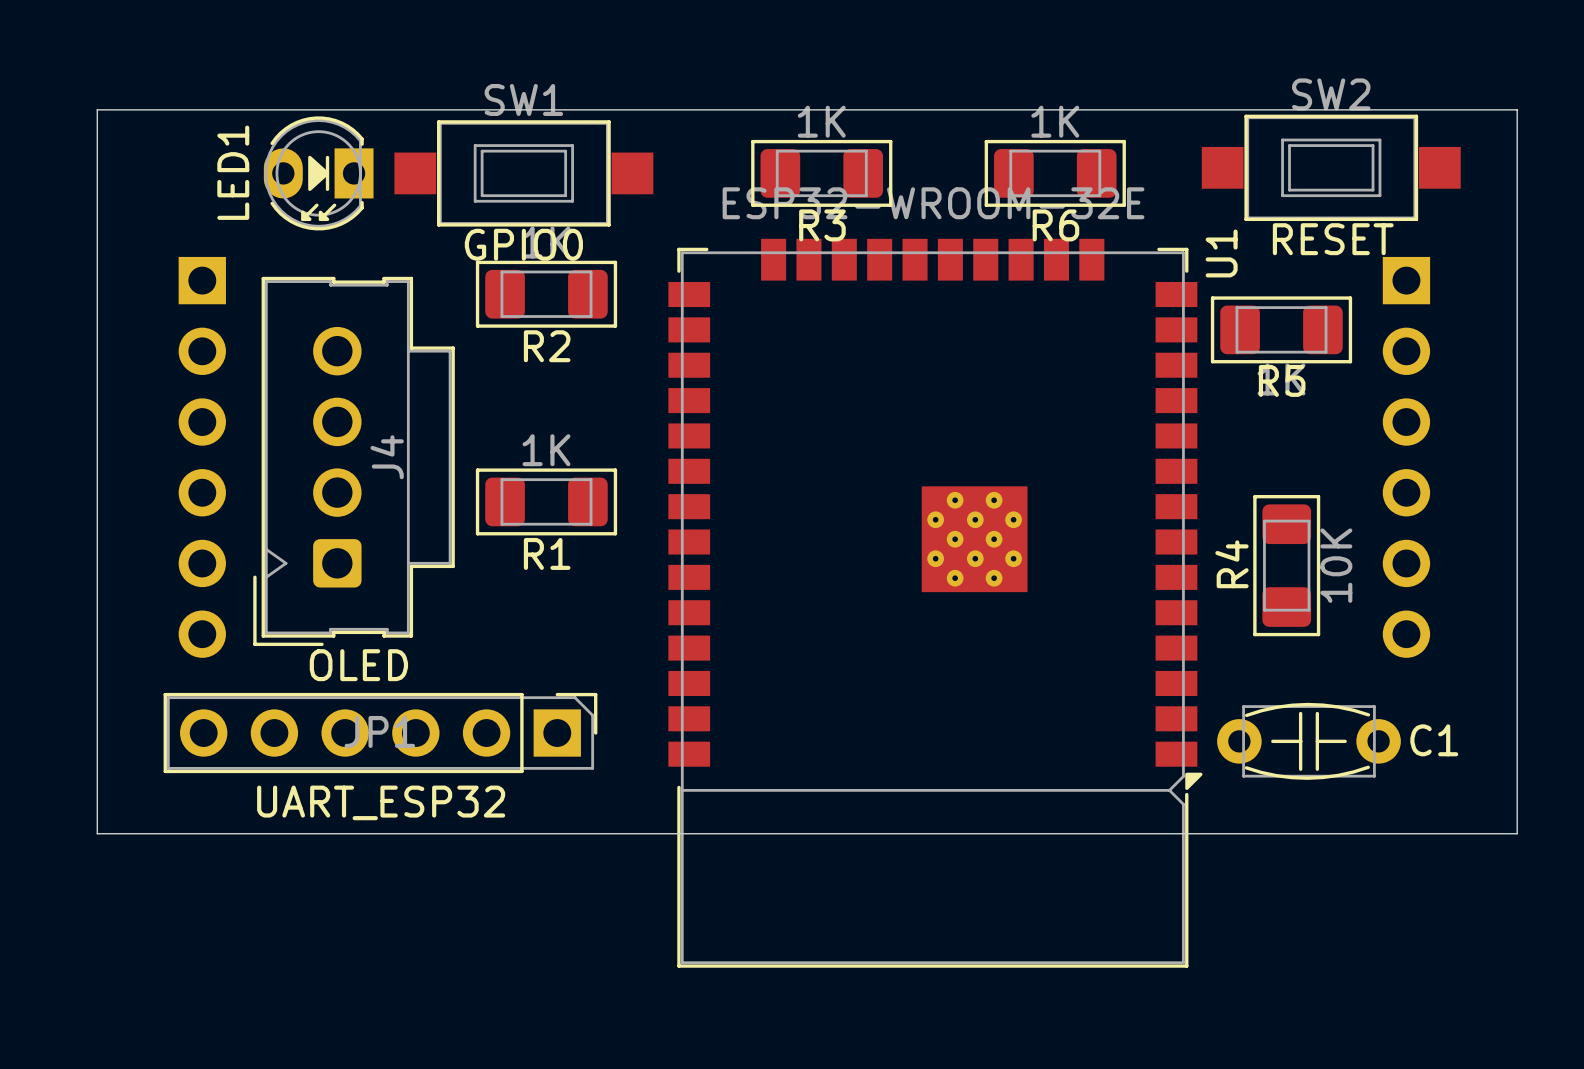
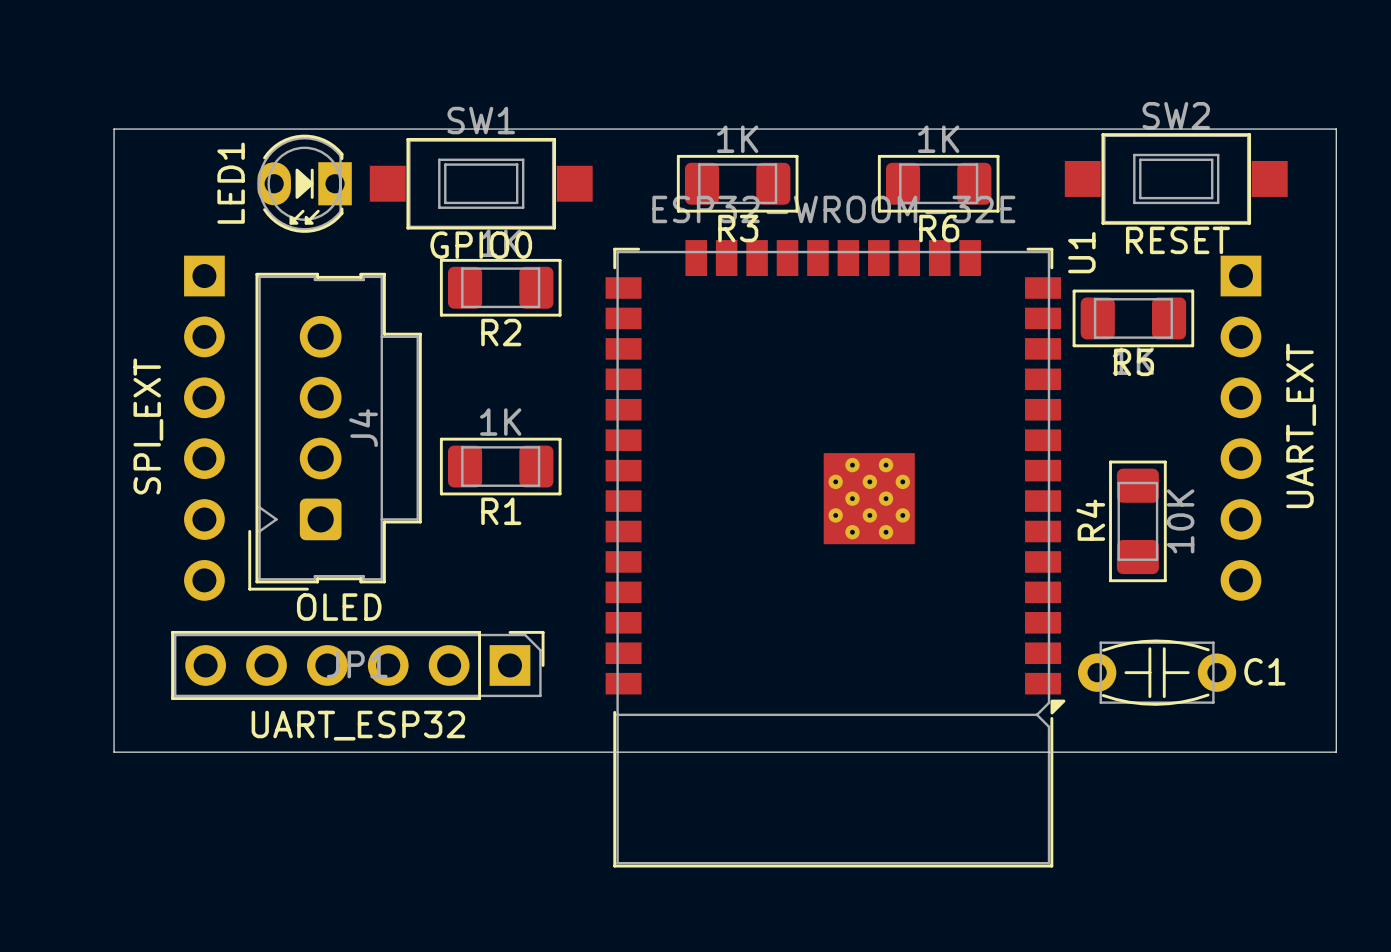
part value: none -> UART_EXT (1301, 425)
part value: none -> SPI_EXT (148, 426)

